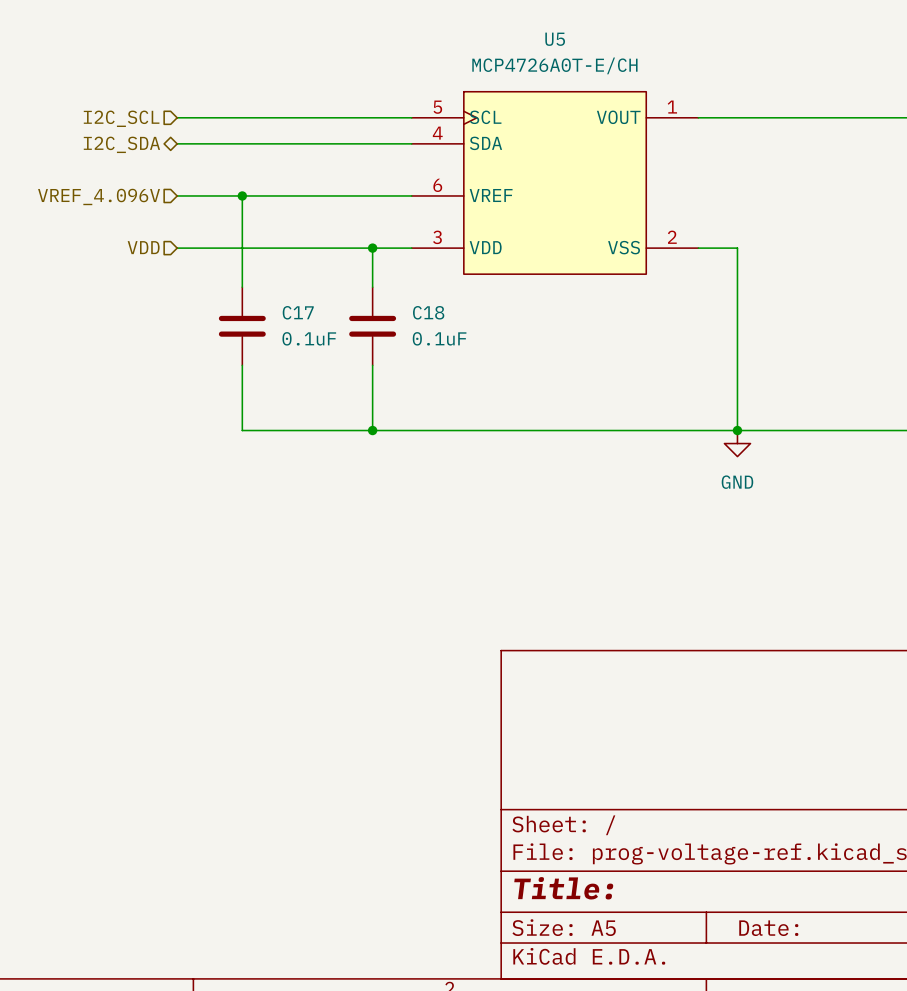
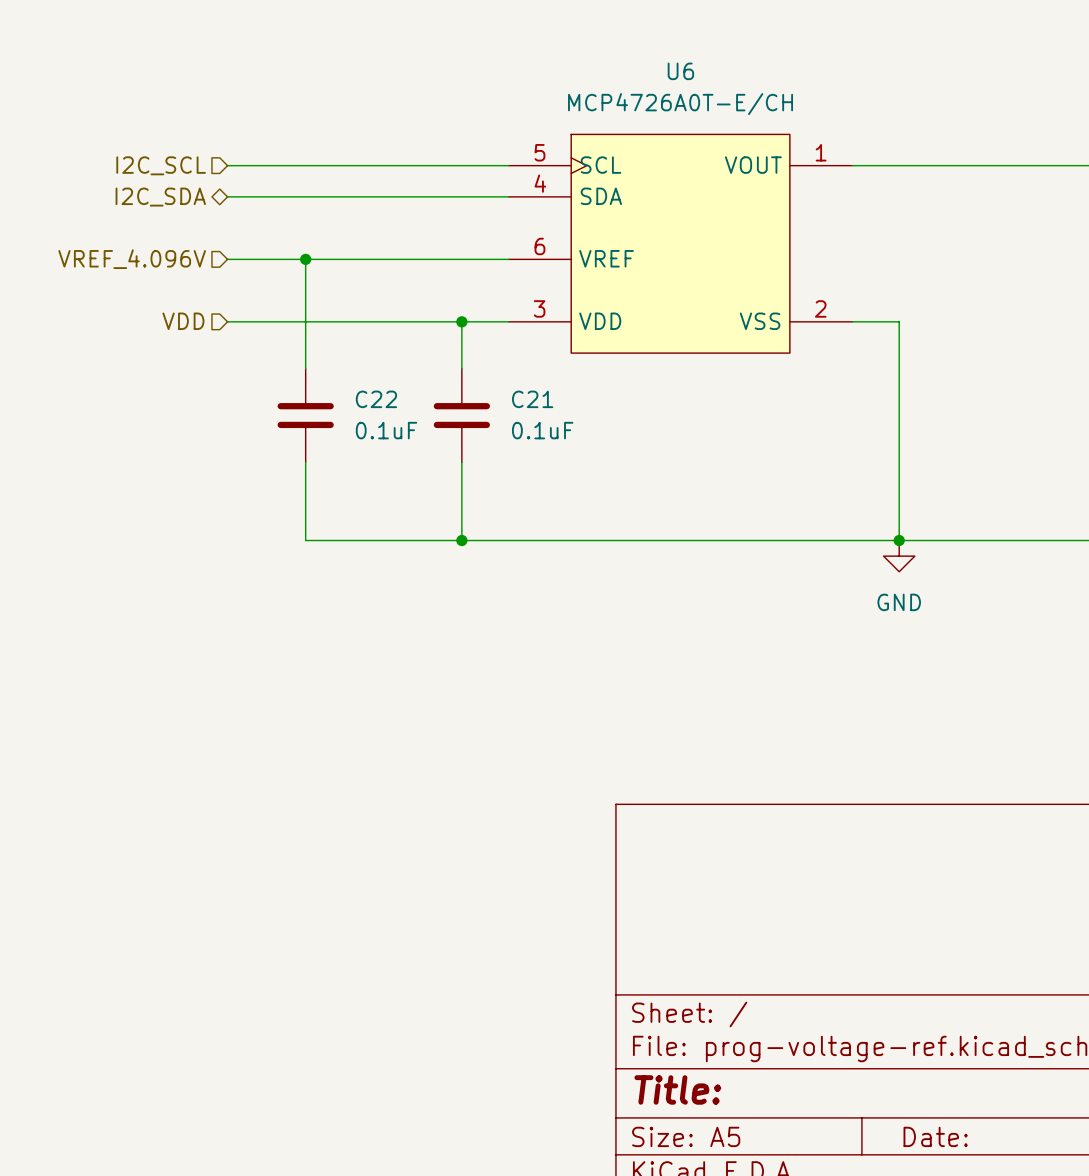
U5 name: U5 (555, 39) -> U6 (680, 71)
C17 name: C17 (298, 312) -> C22 (376, 399)
C18 name: C18 (428, 312) -> C21 (532, 399)

